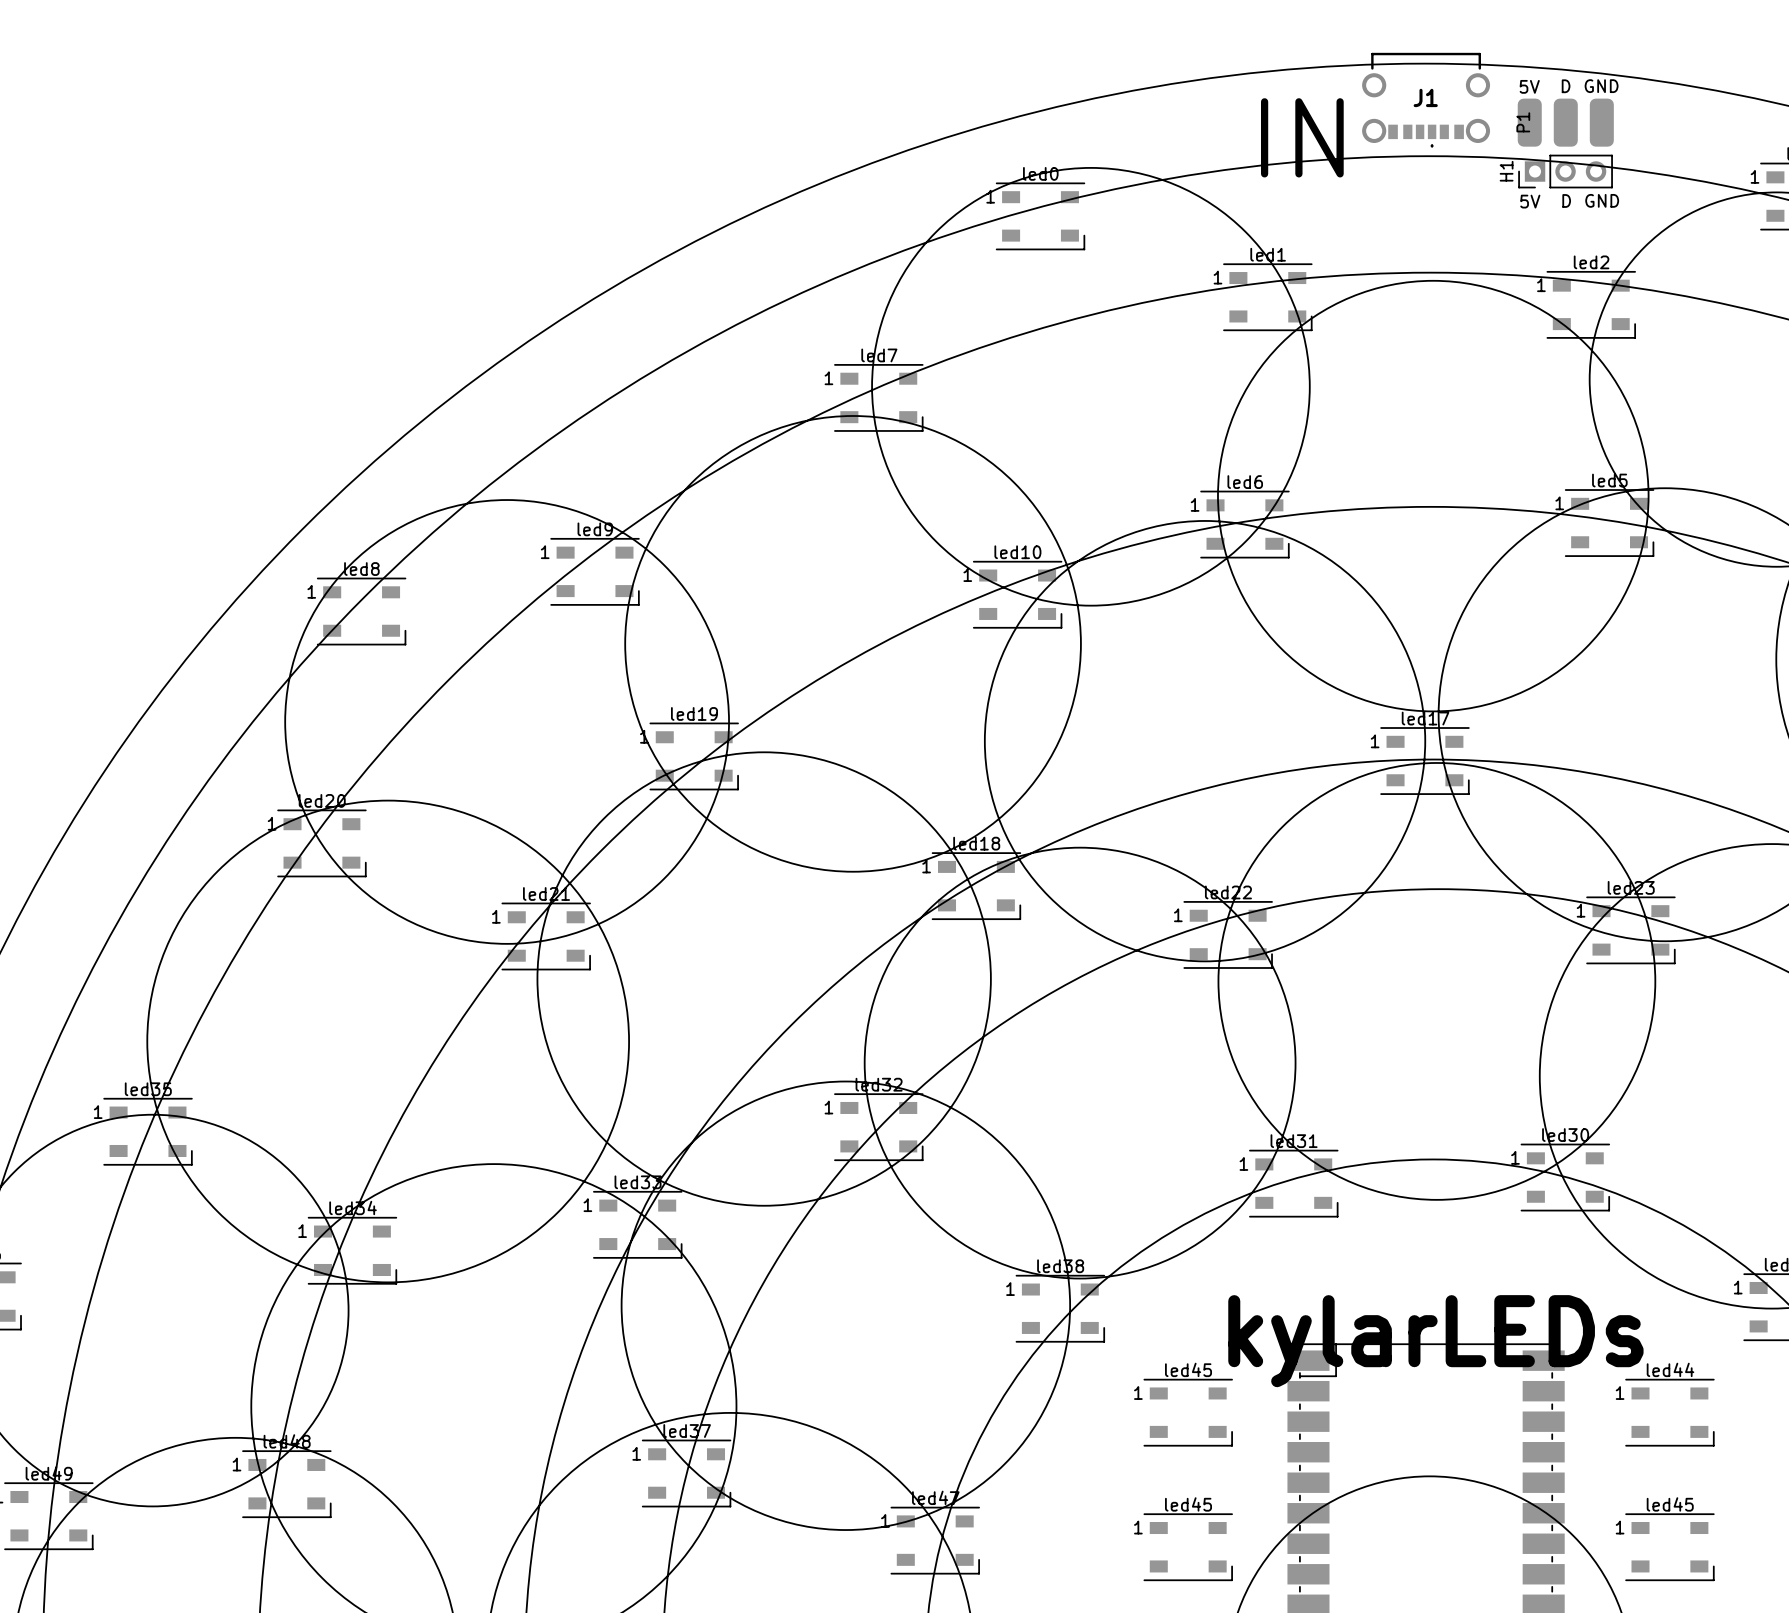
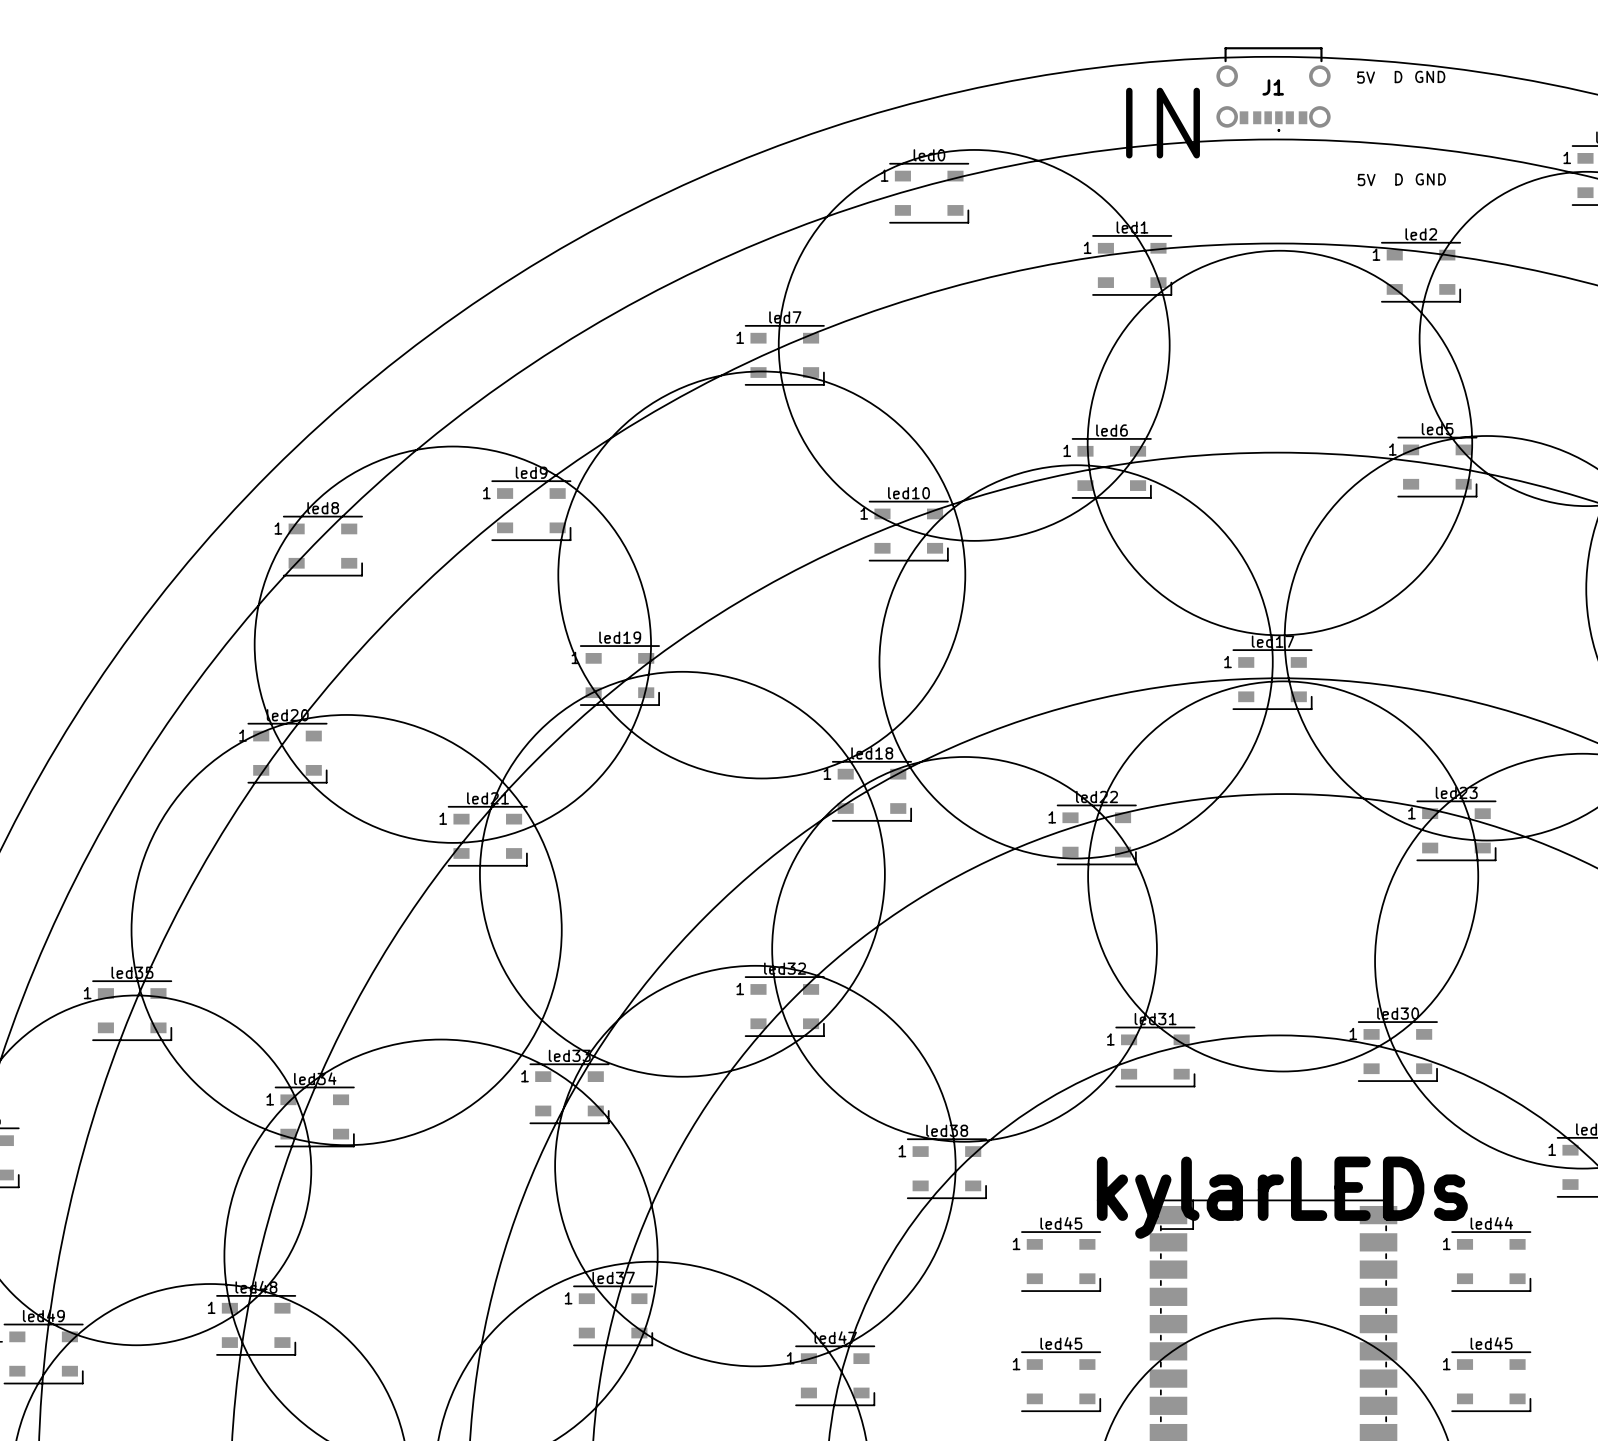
P1: (1565, 122) -> none
H1: (1565, 171) -> none

